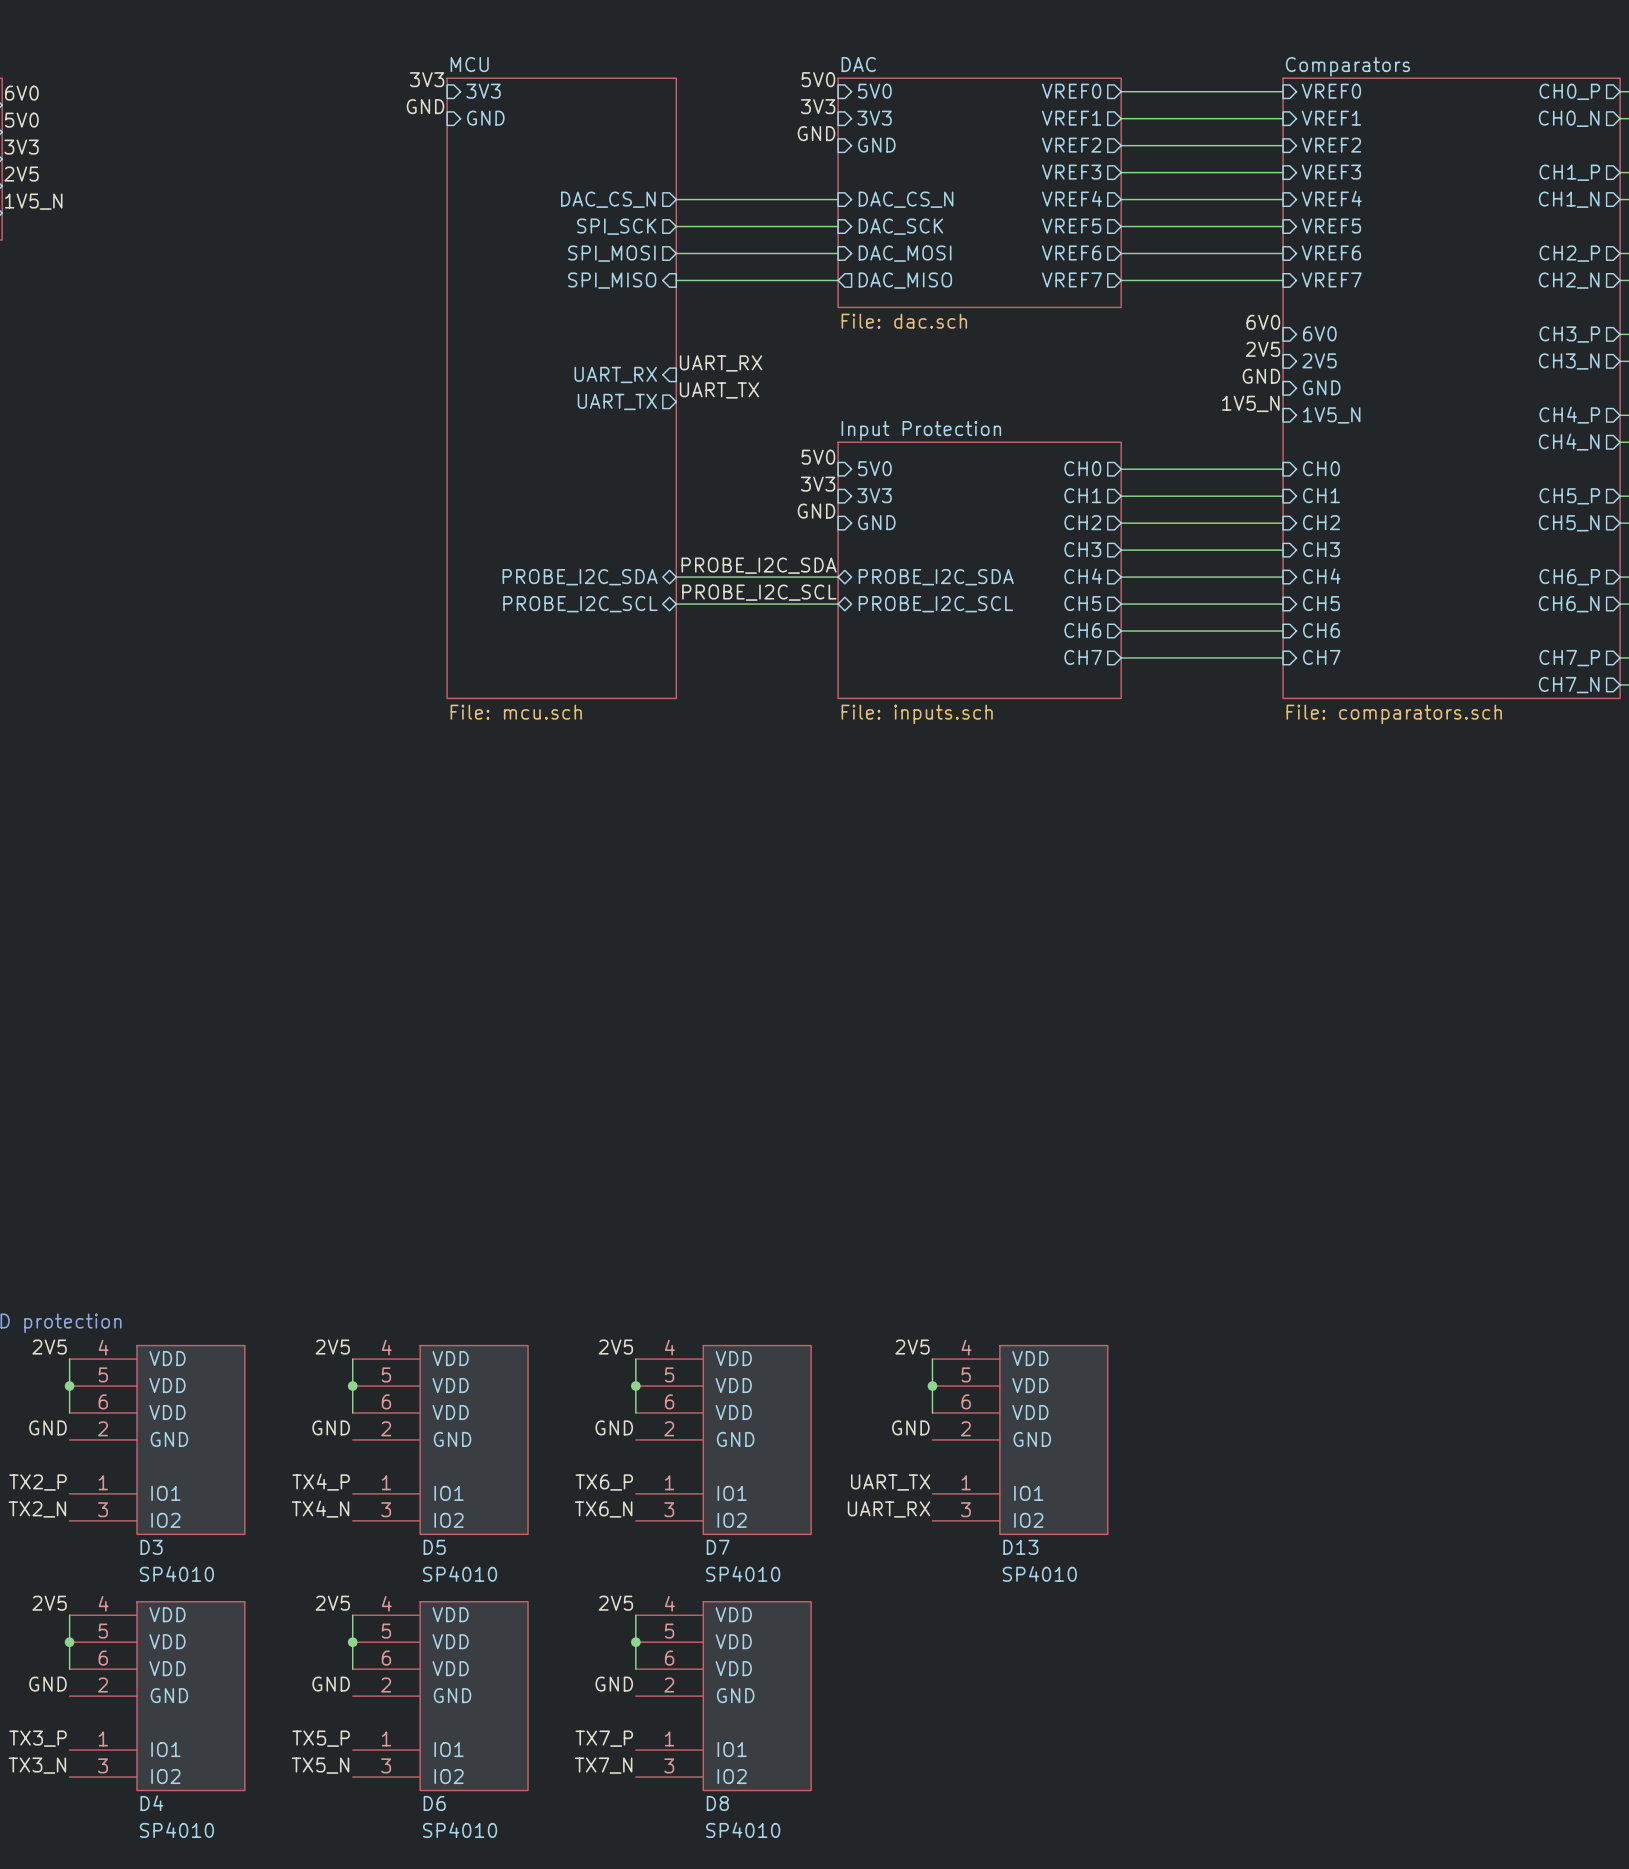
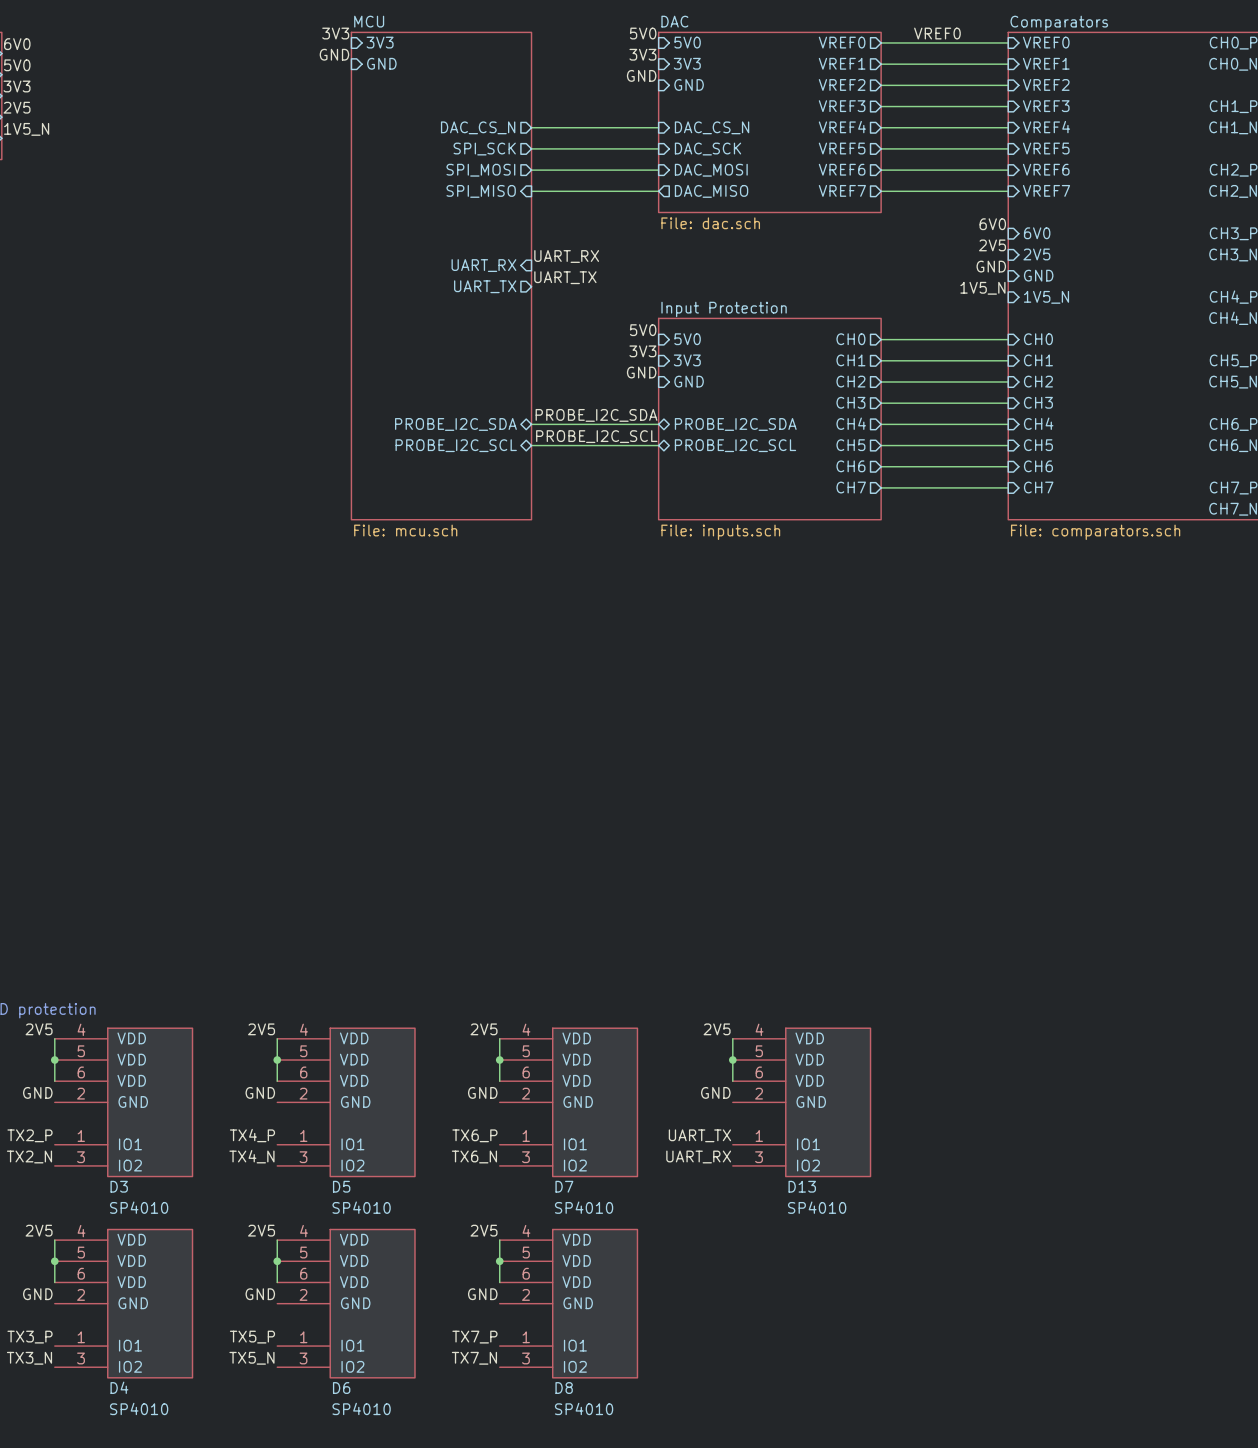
label: none -> VREF0 (937, 33)

